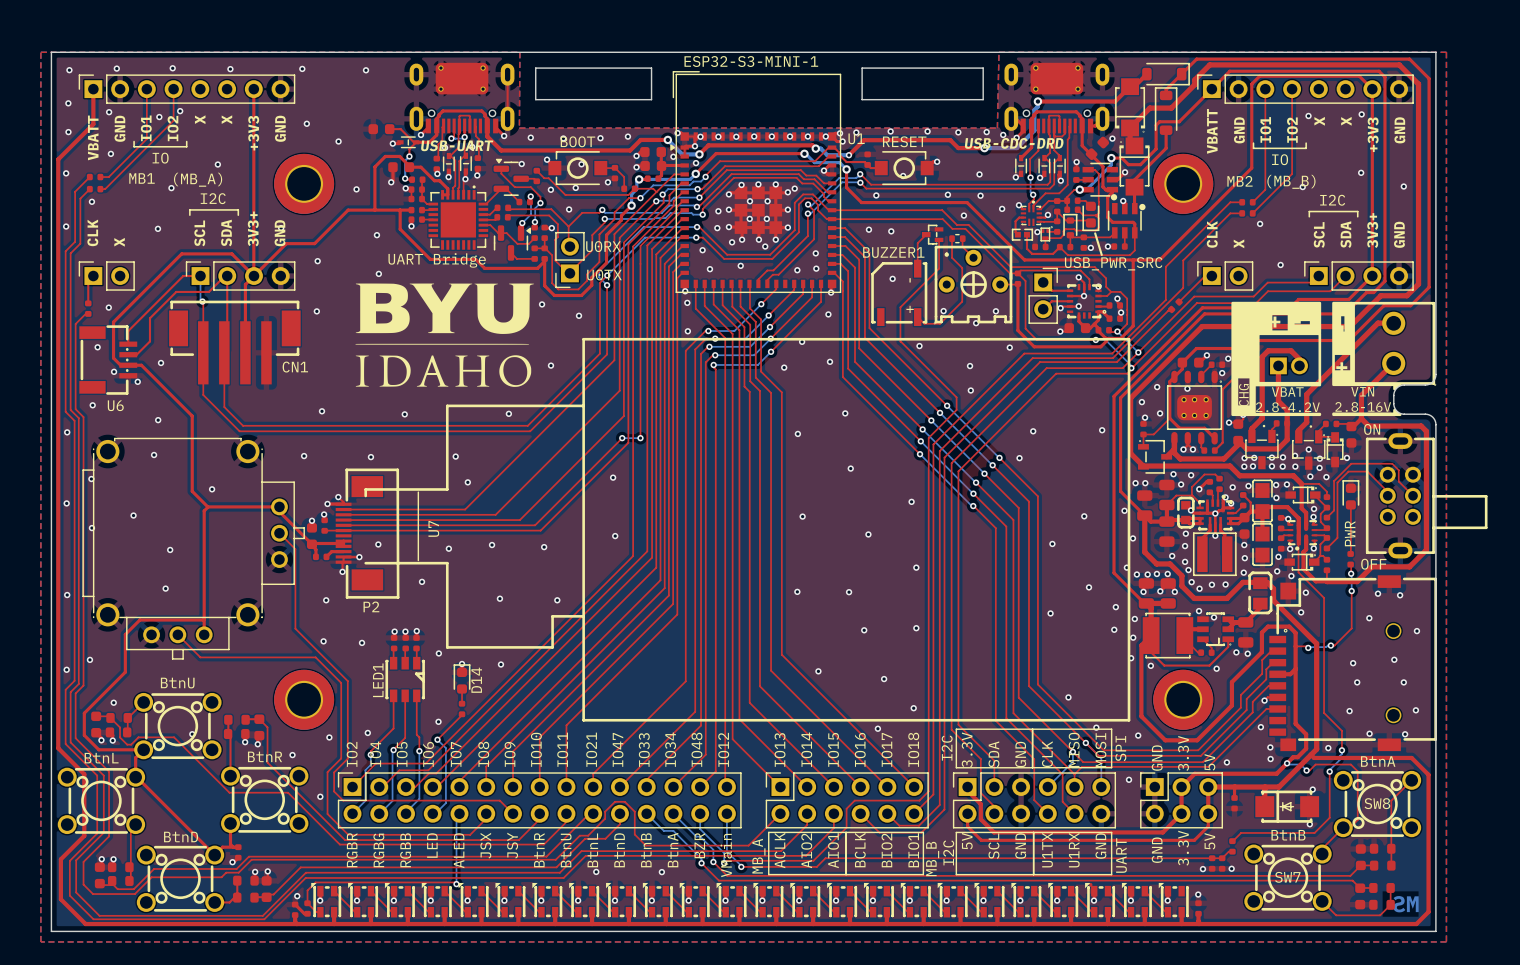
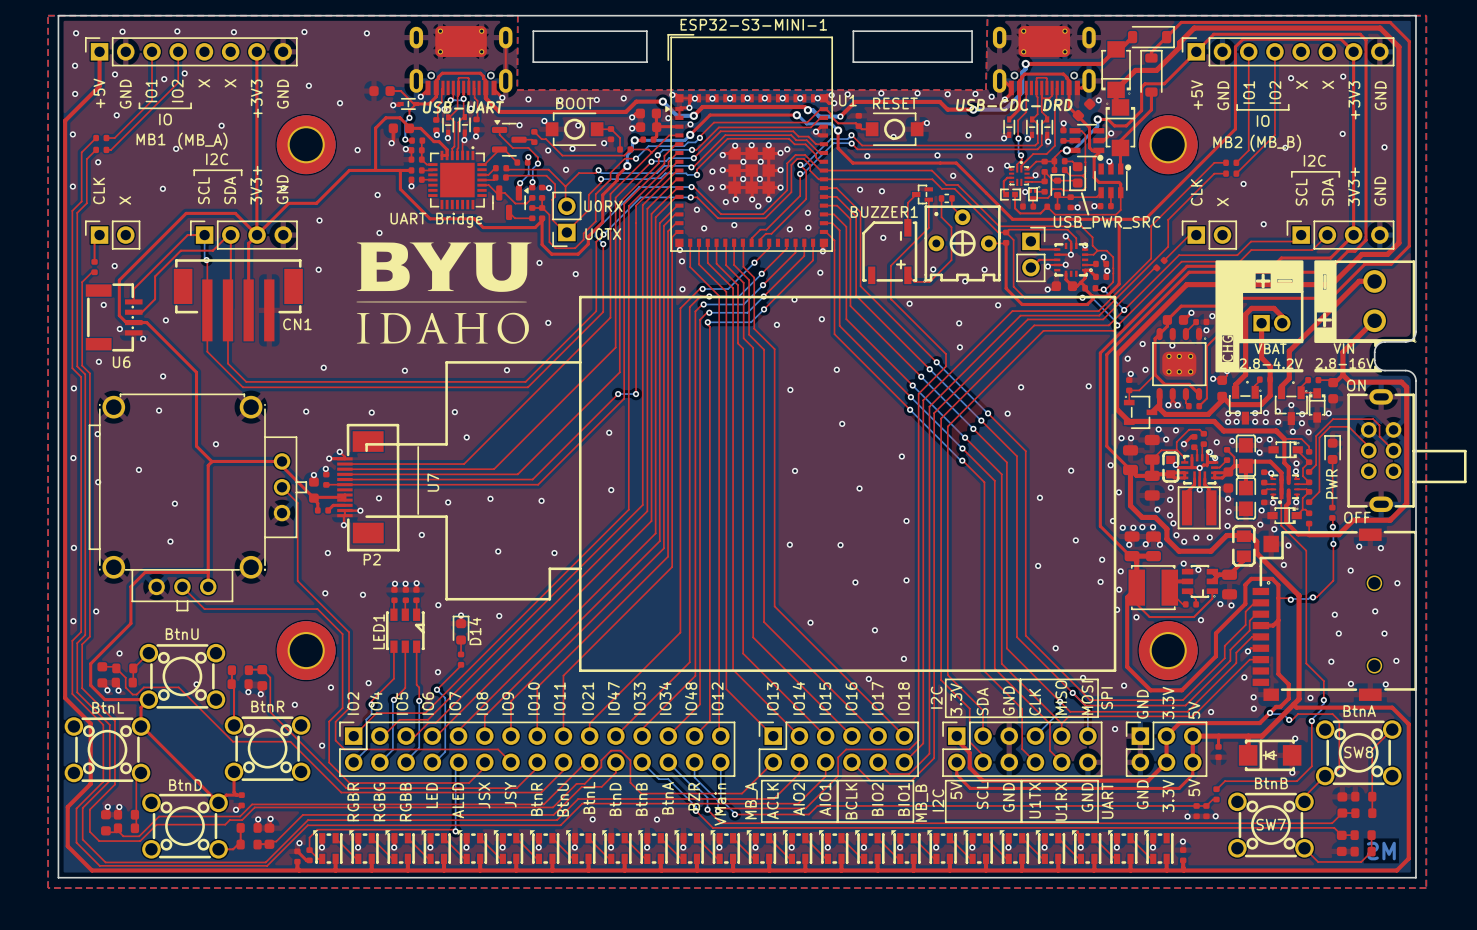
MB2 text: none -> +5V (1197, 94)
MB2 text: VBATT (1212, 131) -> none
MB1 text: VBATT (93, 137) -> +5V (99, 93)

